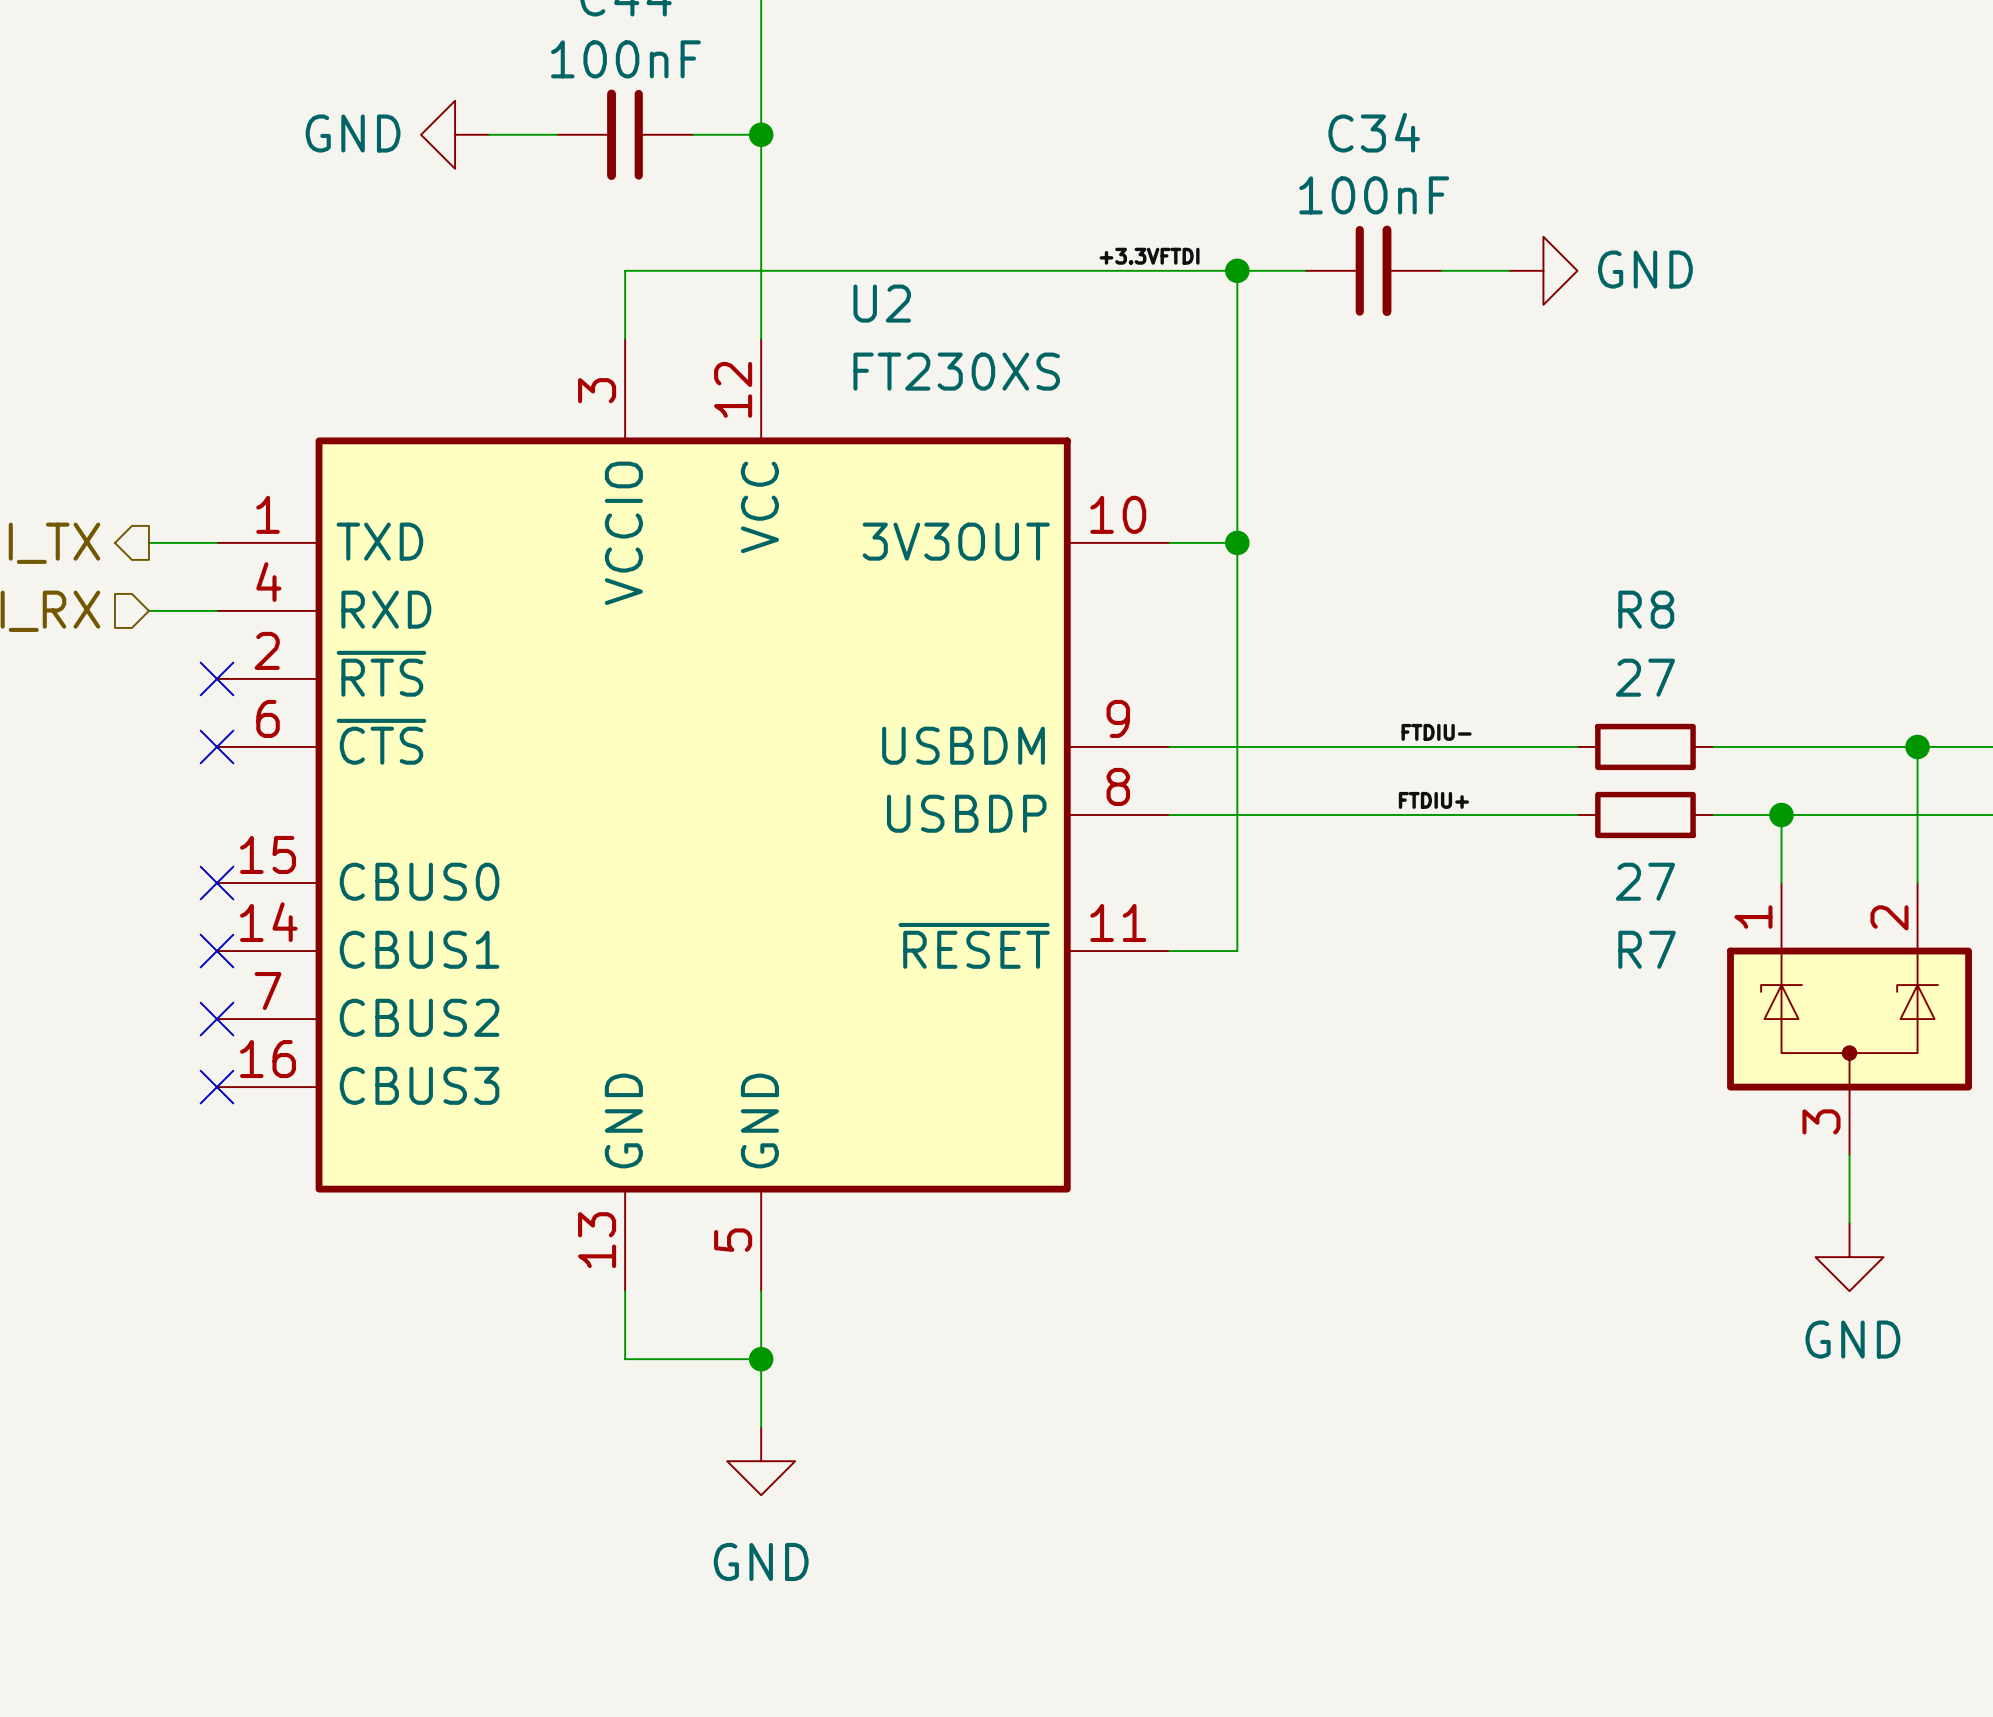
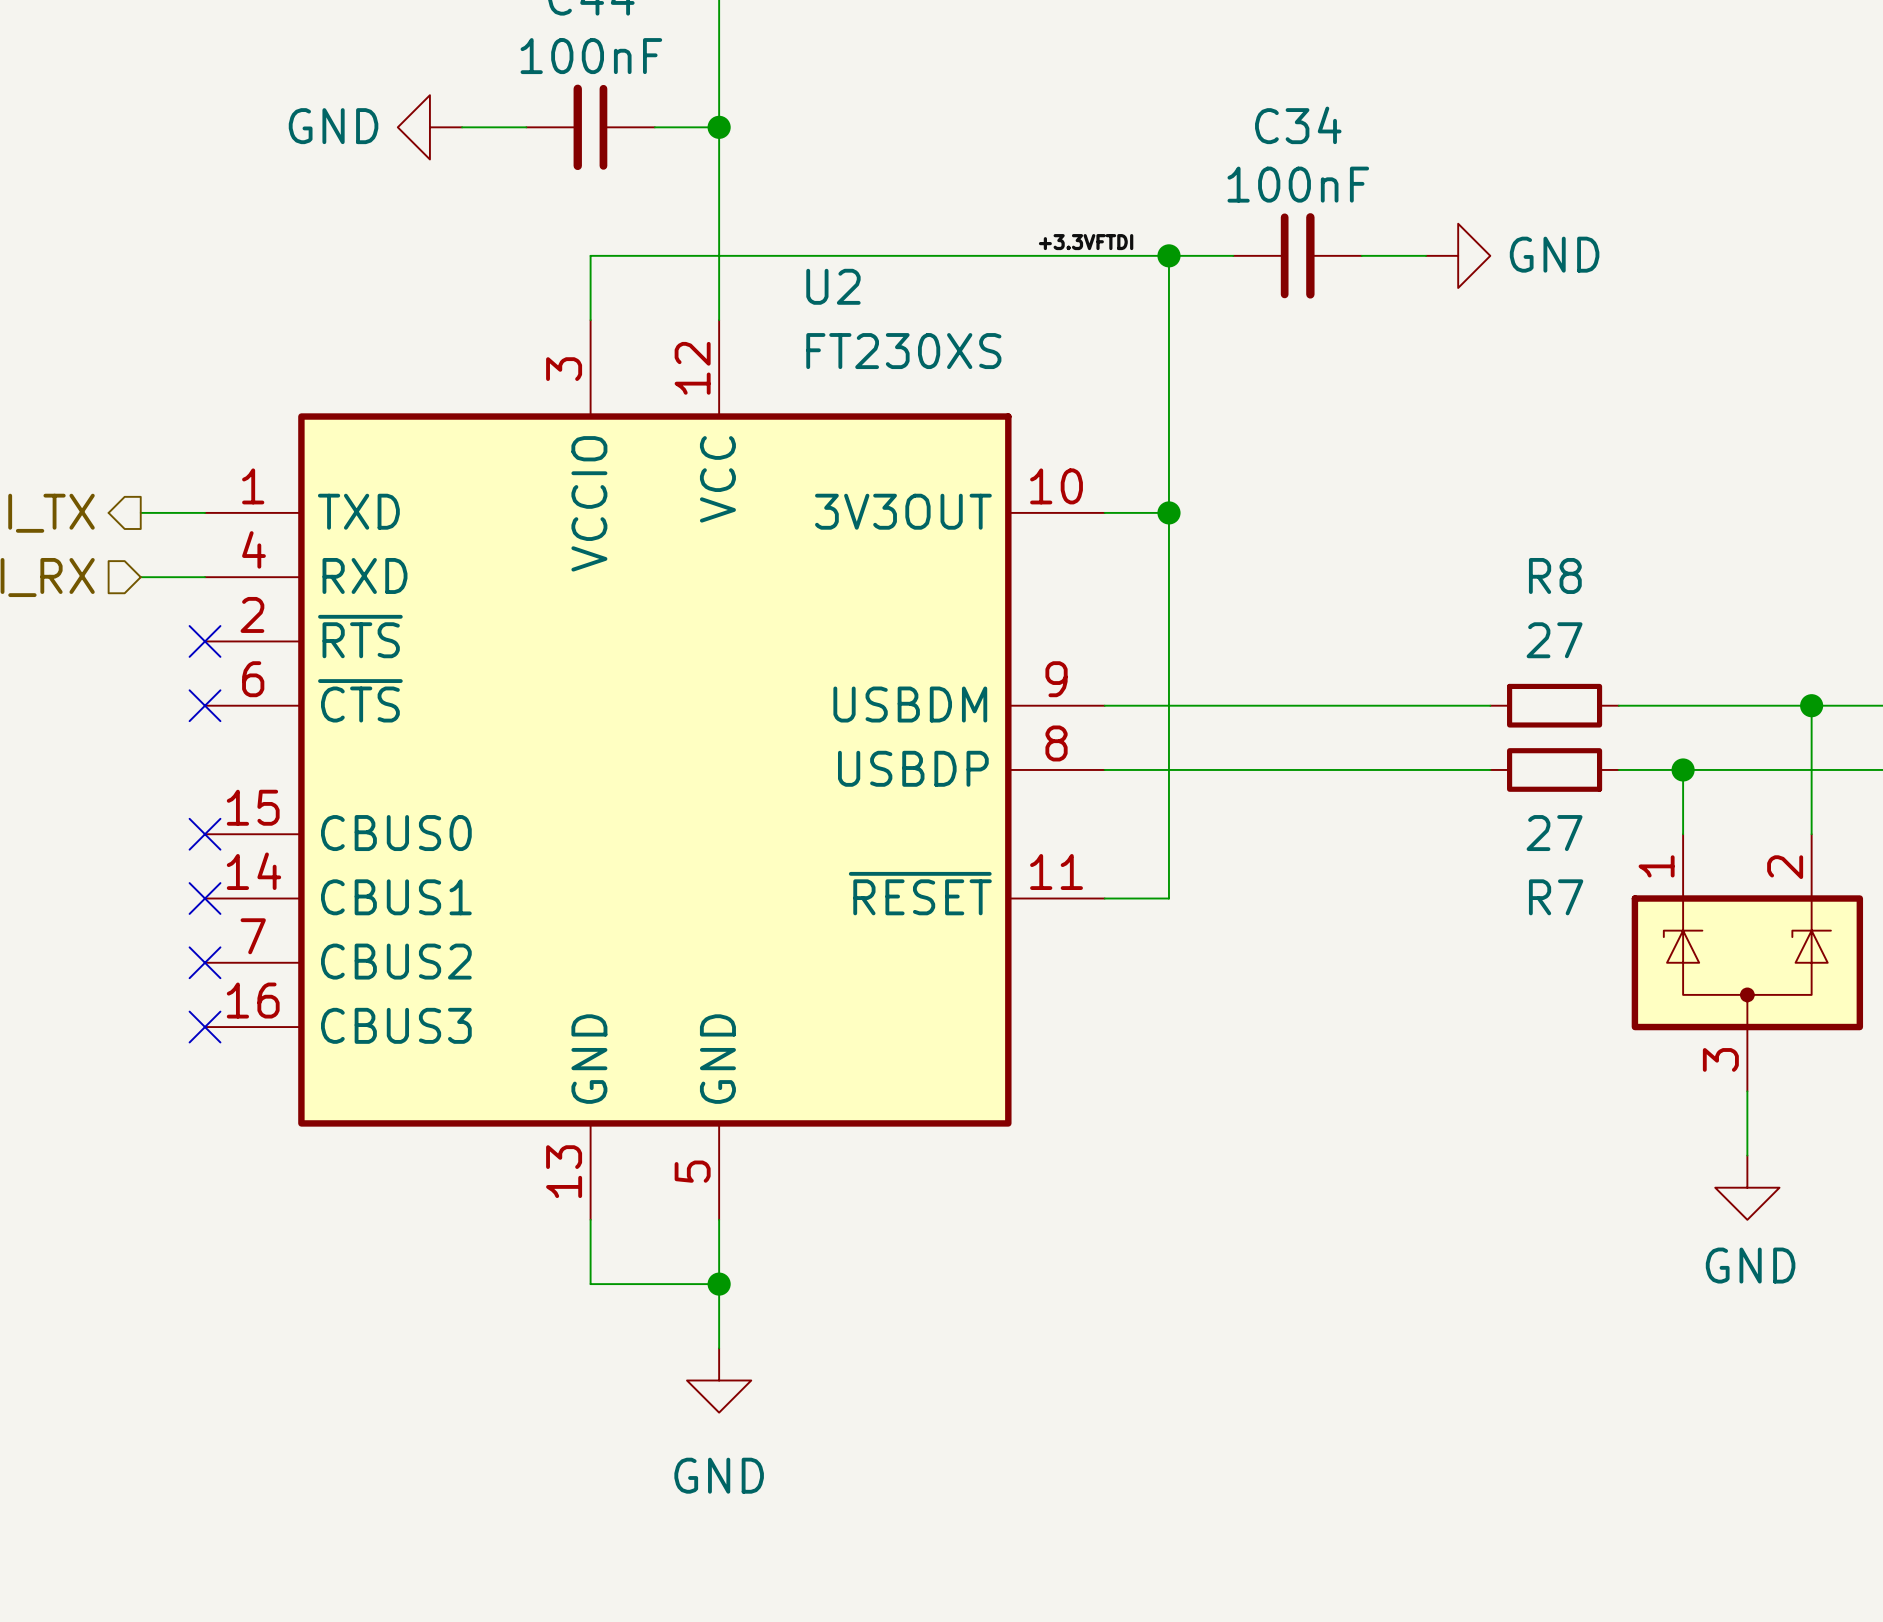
label: FTDIU- (1436, 732) -> none
label: FTDIU+ (1433, 800) -> none

